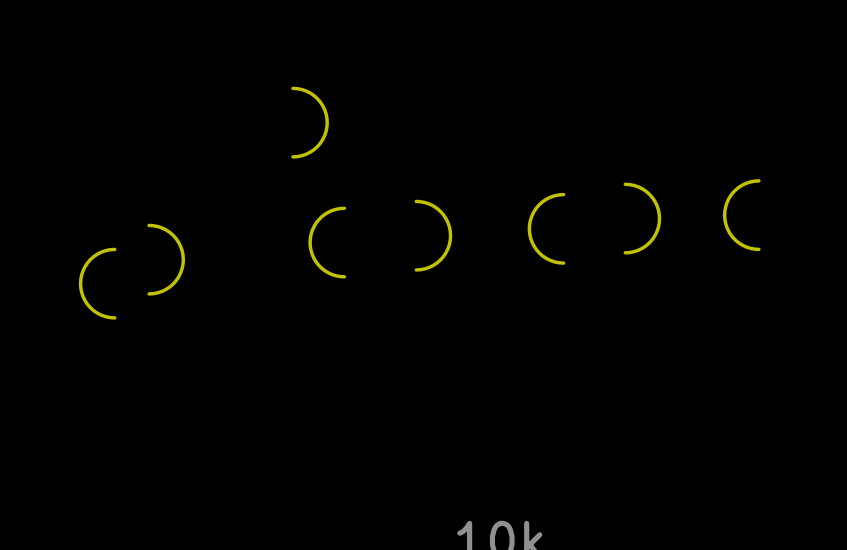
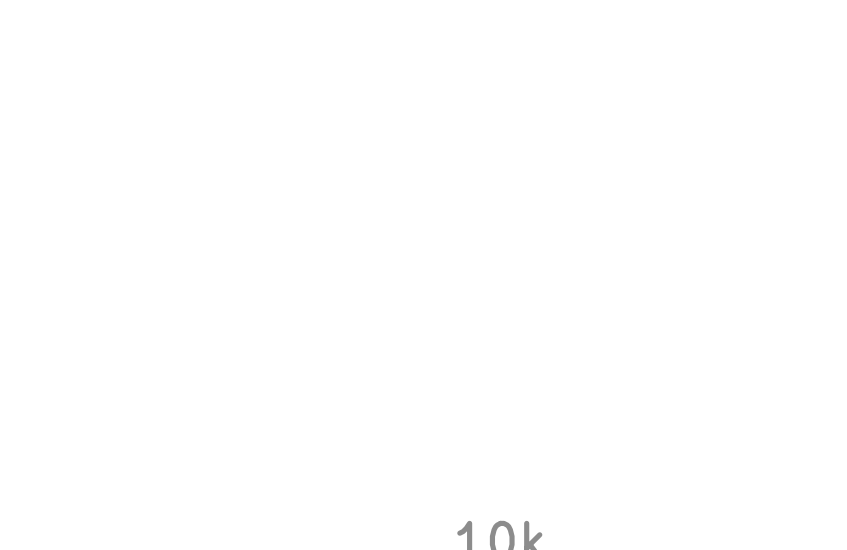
board edge: (292, 88) (306, 90) (317, 98) (324, 109) (327, 122) (324, 135) (317, 146) (306, 154) (292, 156) -> none
board edge: (758, 180) (742, 184) (733, 192) (726, 202) (724, 215) (726, 227) (733, 237) (742, 245) (758, 249) -> none
board edge: (625, 184) (638, 186) (649, 194) (656, 205) (659, 218) (656, 231) (649, 242) (638, 250) (625, 252) -> none
board edge: (563, 194) (550, 197) (539, 204) (531, 215) (529, 228) (531, 241) (539, 253) (550, 260) (563, 263) -> none
board edge: (416, 201) (429, 204) (440, 211) (447, 222) (450, 235) (447, 248) (440, 259) (429, 267) (416, 269) -> none
board edge: (344, 208) (328, 212) (318, 219) (312, 230) (310, 242) (312, 254) (321, 268) (332, 274) (344, 276) -> none
board edge: (149, 225) (162, 228) (173, 235) (180, 246) (183, 259) (180, 272) (173, 283) (162, 291) (149, 293) -> none
board edge: (114, 249) (101, 252) (90, 259) (83, 270) (80, 283) (83, 296) (90, 307) (101, 315) (114, 317) -> none

